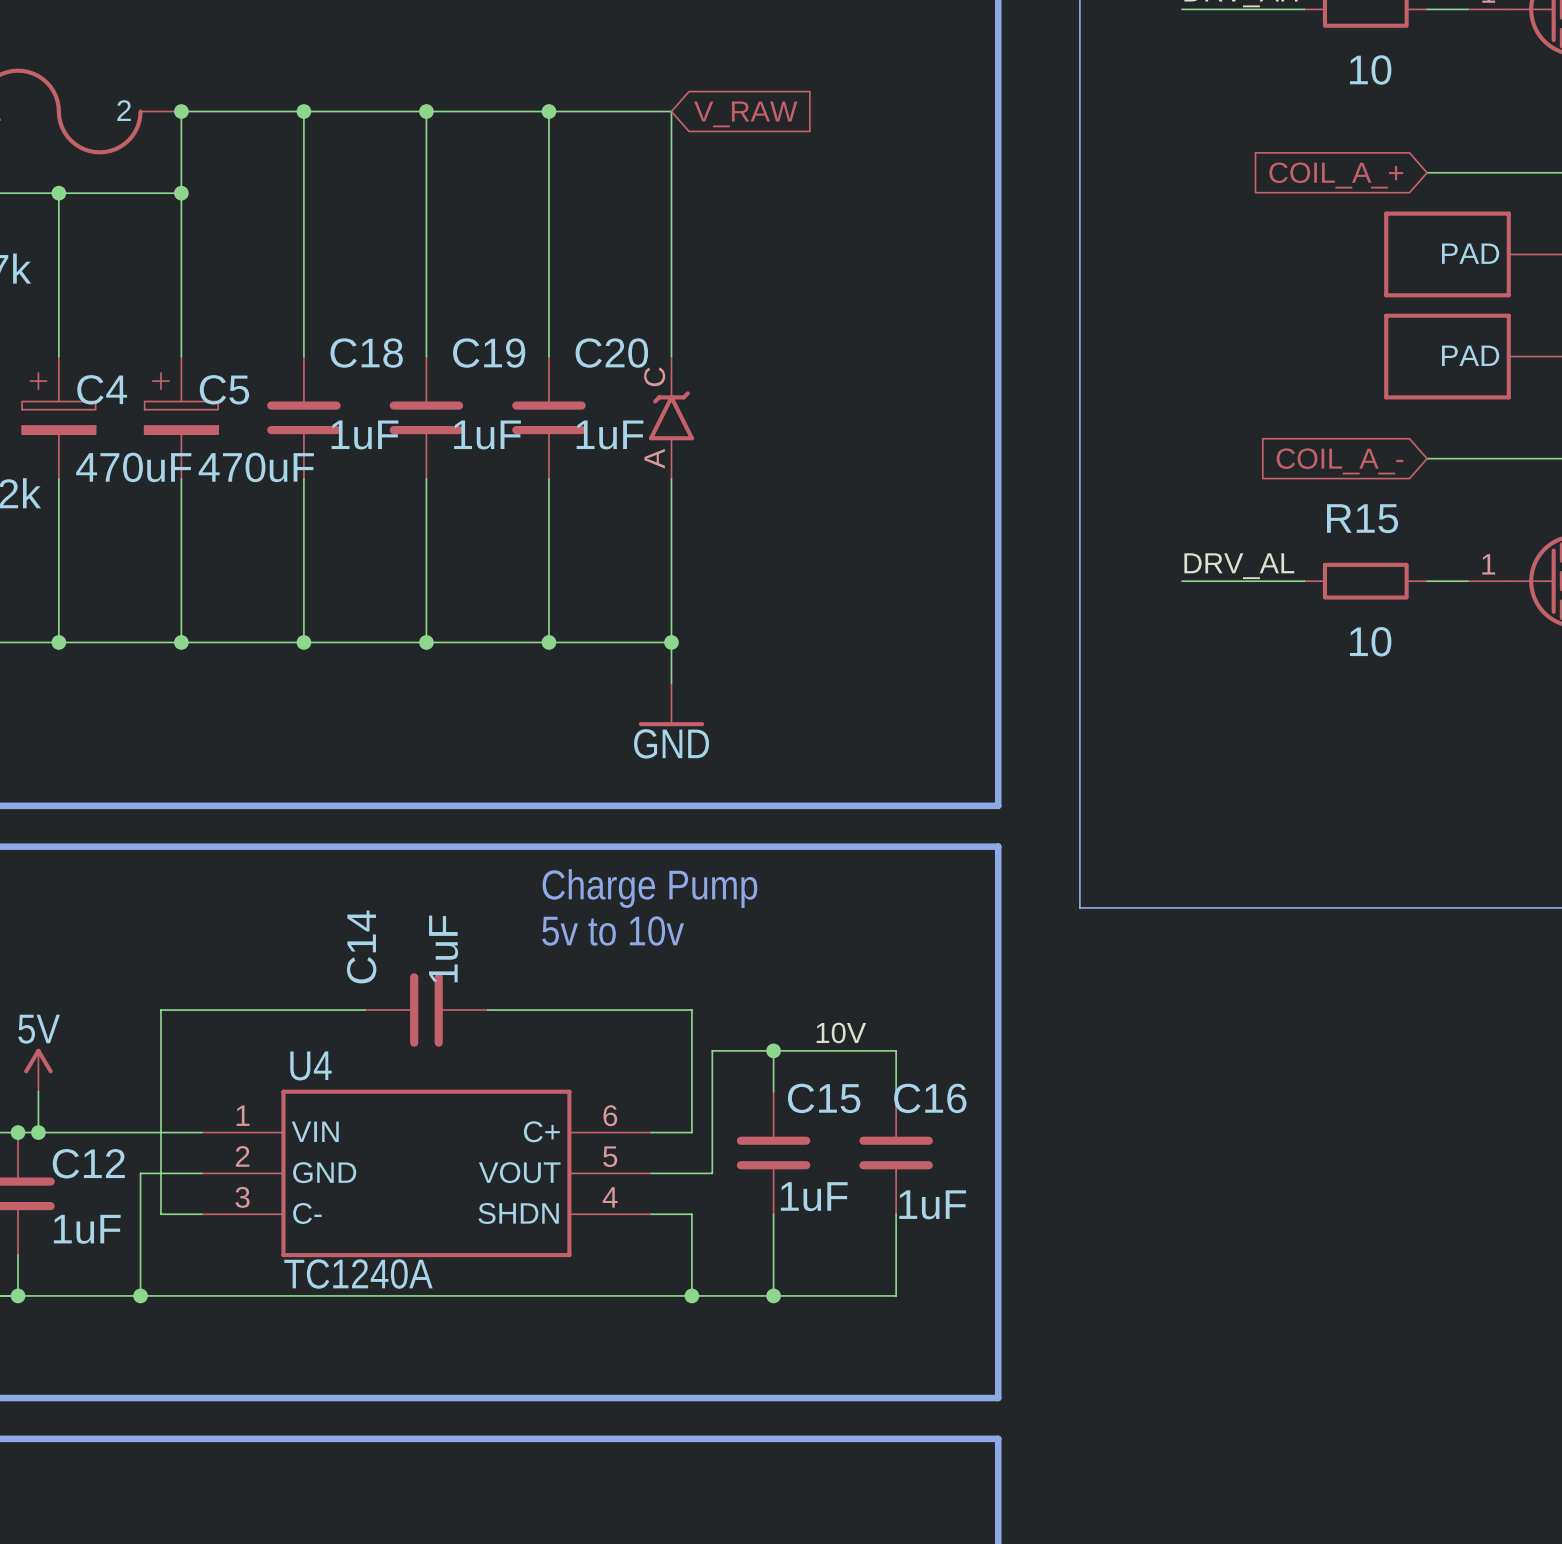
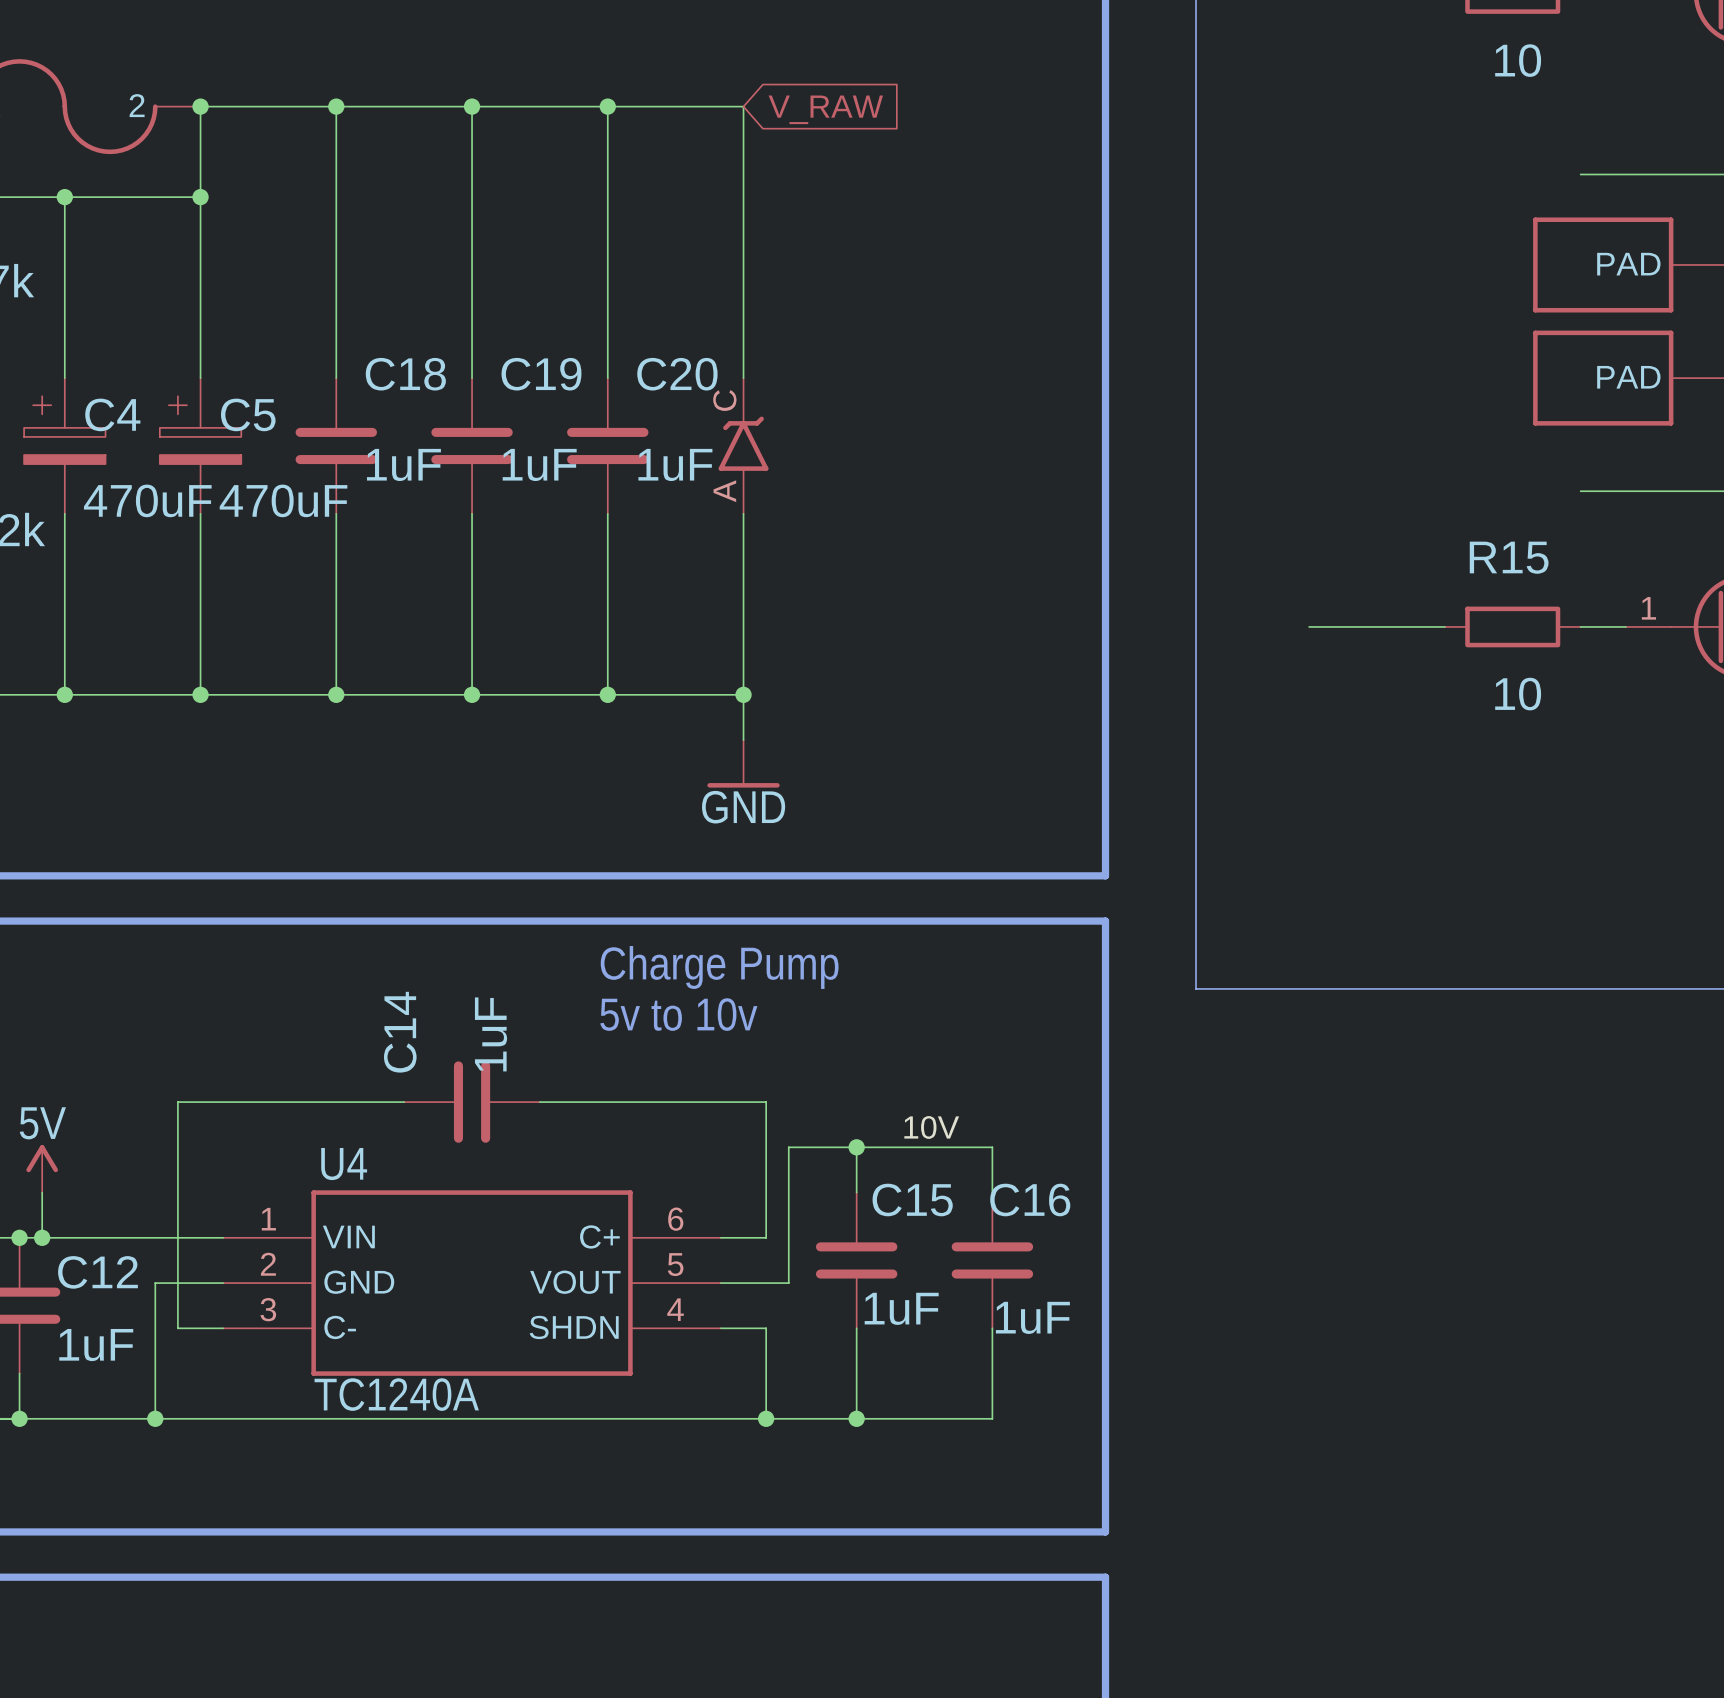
global label: COIL_A_+ (1336, 175) -> none
global label: COIL_A_- (1339, 461) -> none
label: DRV_AL (1239, 566) -> none

